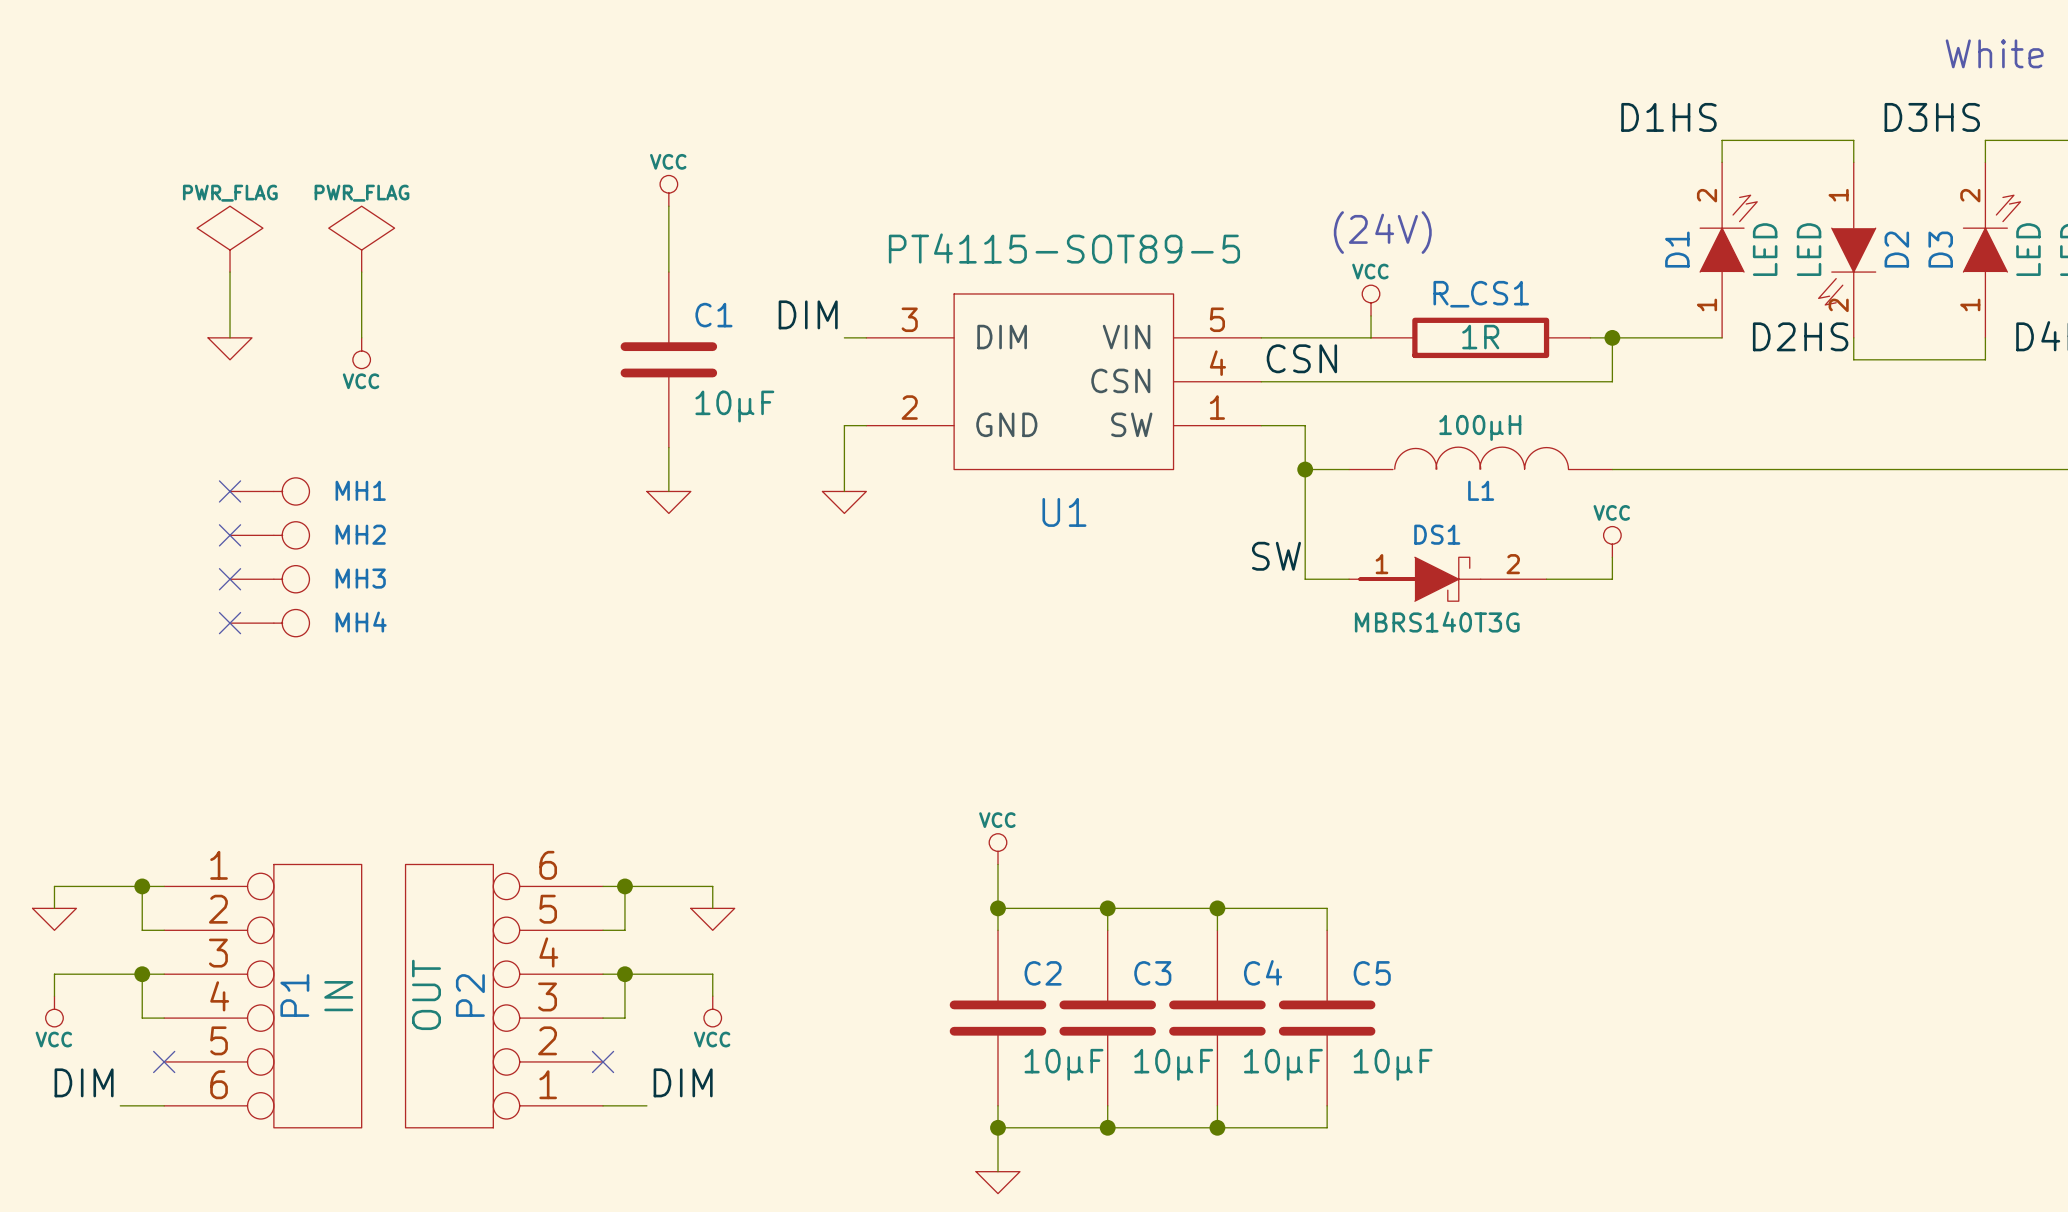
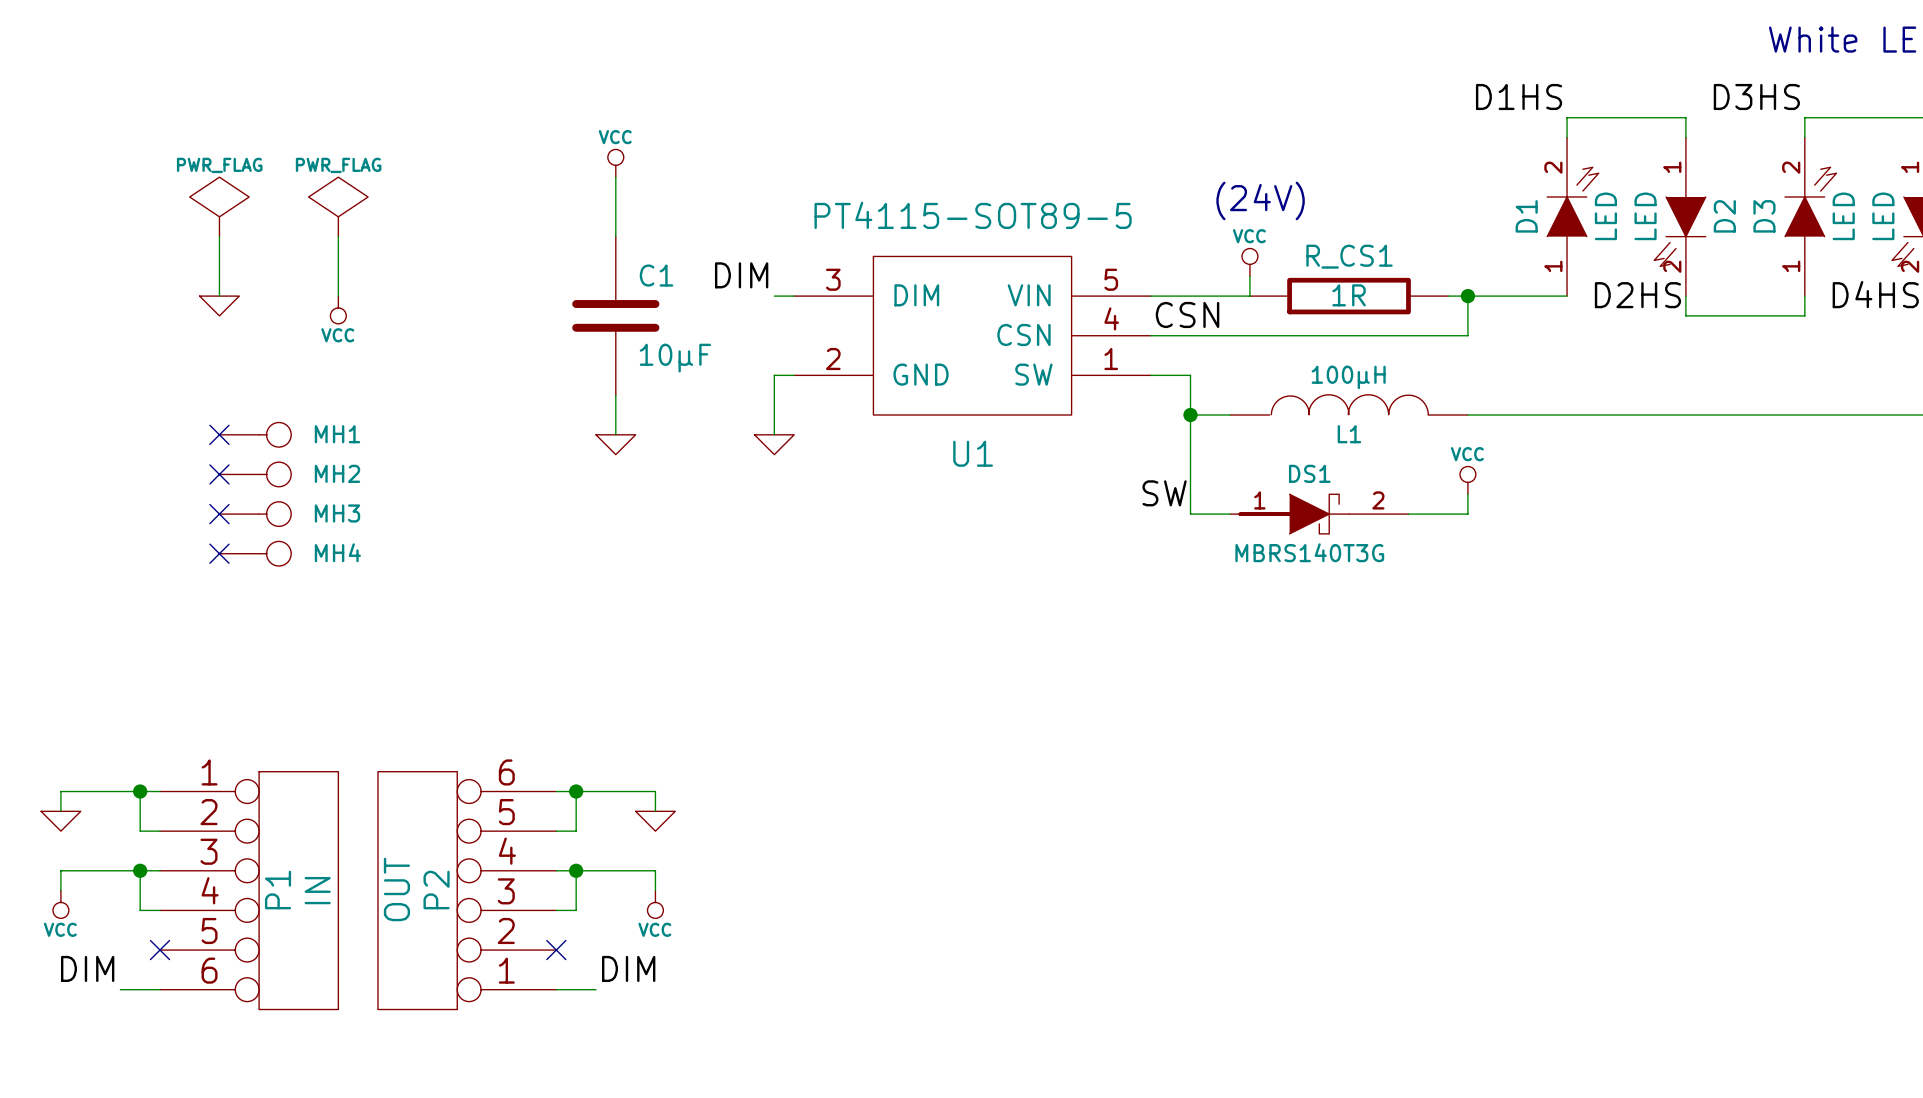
power symbol: VCC (997, 849) -> none
wire: (997, 864) (997, 930) -> none
wire: (997, 908) (1327, 908) (1327, 930) -> none
junction: (997, 908) -> none
wire: (1107, 908) (1107, 930) -> none
junction: (1107, 908) -> none
wire: (1217, 908) (1217, 930) -> none
junction: (1217, 908) -> none
C2: 10µF (997, 1018) -> none
C3: 10µF (1107, 1018) -> none
C4: 10µF (1217, 1018) -> none
C5: 10µF (1327, 1018) -> none
wire: (997, 1105) (997, 1171) -> none
wire: (1107, 1105) (1107, 1127) -> none
wire: (1217, 1105) (1217, 1127) -> none
wire: (1327, 1105) (1327, 1127) (997, 1127) -> none
junction: (997, 1127) -> none
junction: (1107, 1127) -> none
junction: (1217, 1127) -> none
power symbol: (997, 1182) -> none

